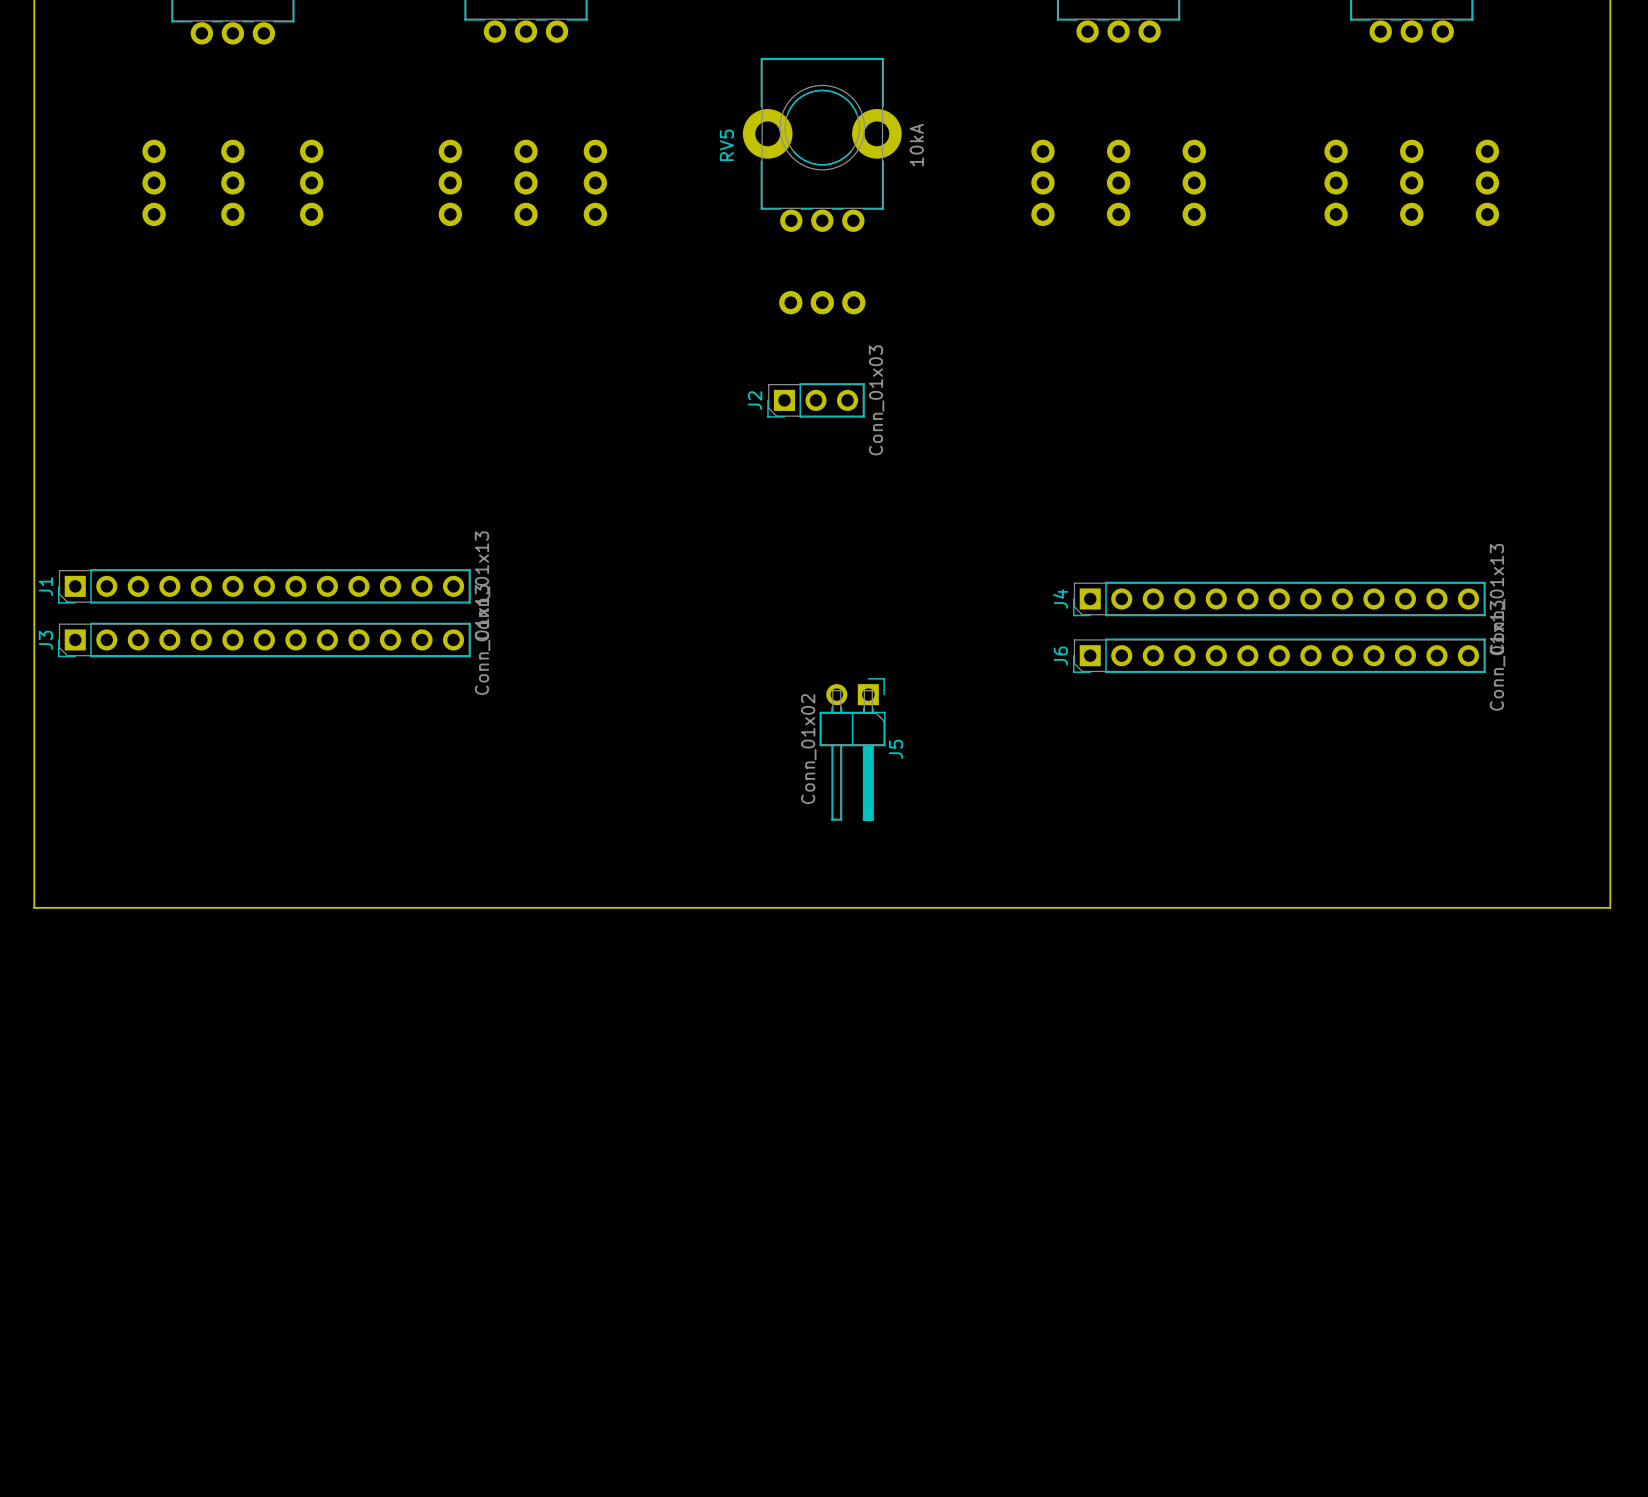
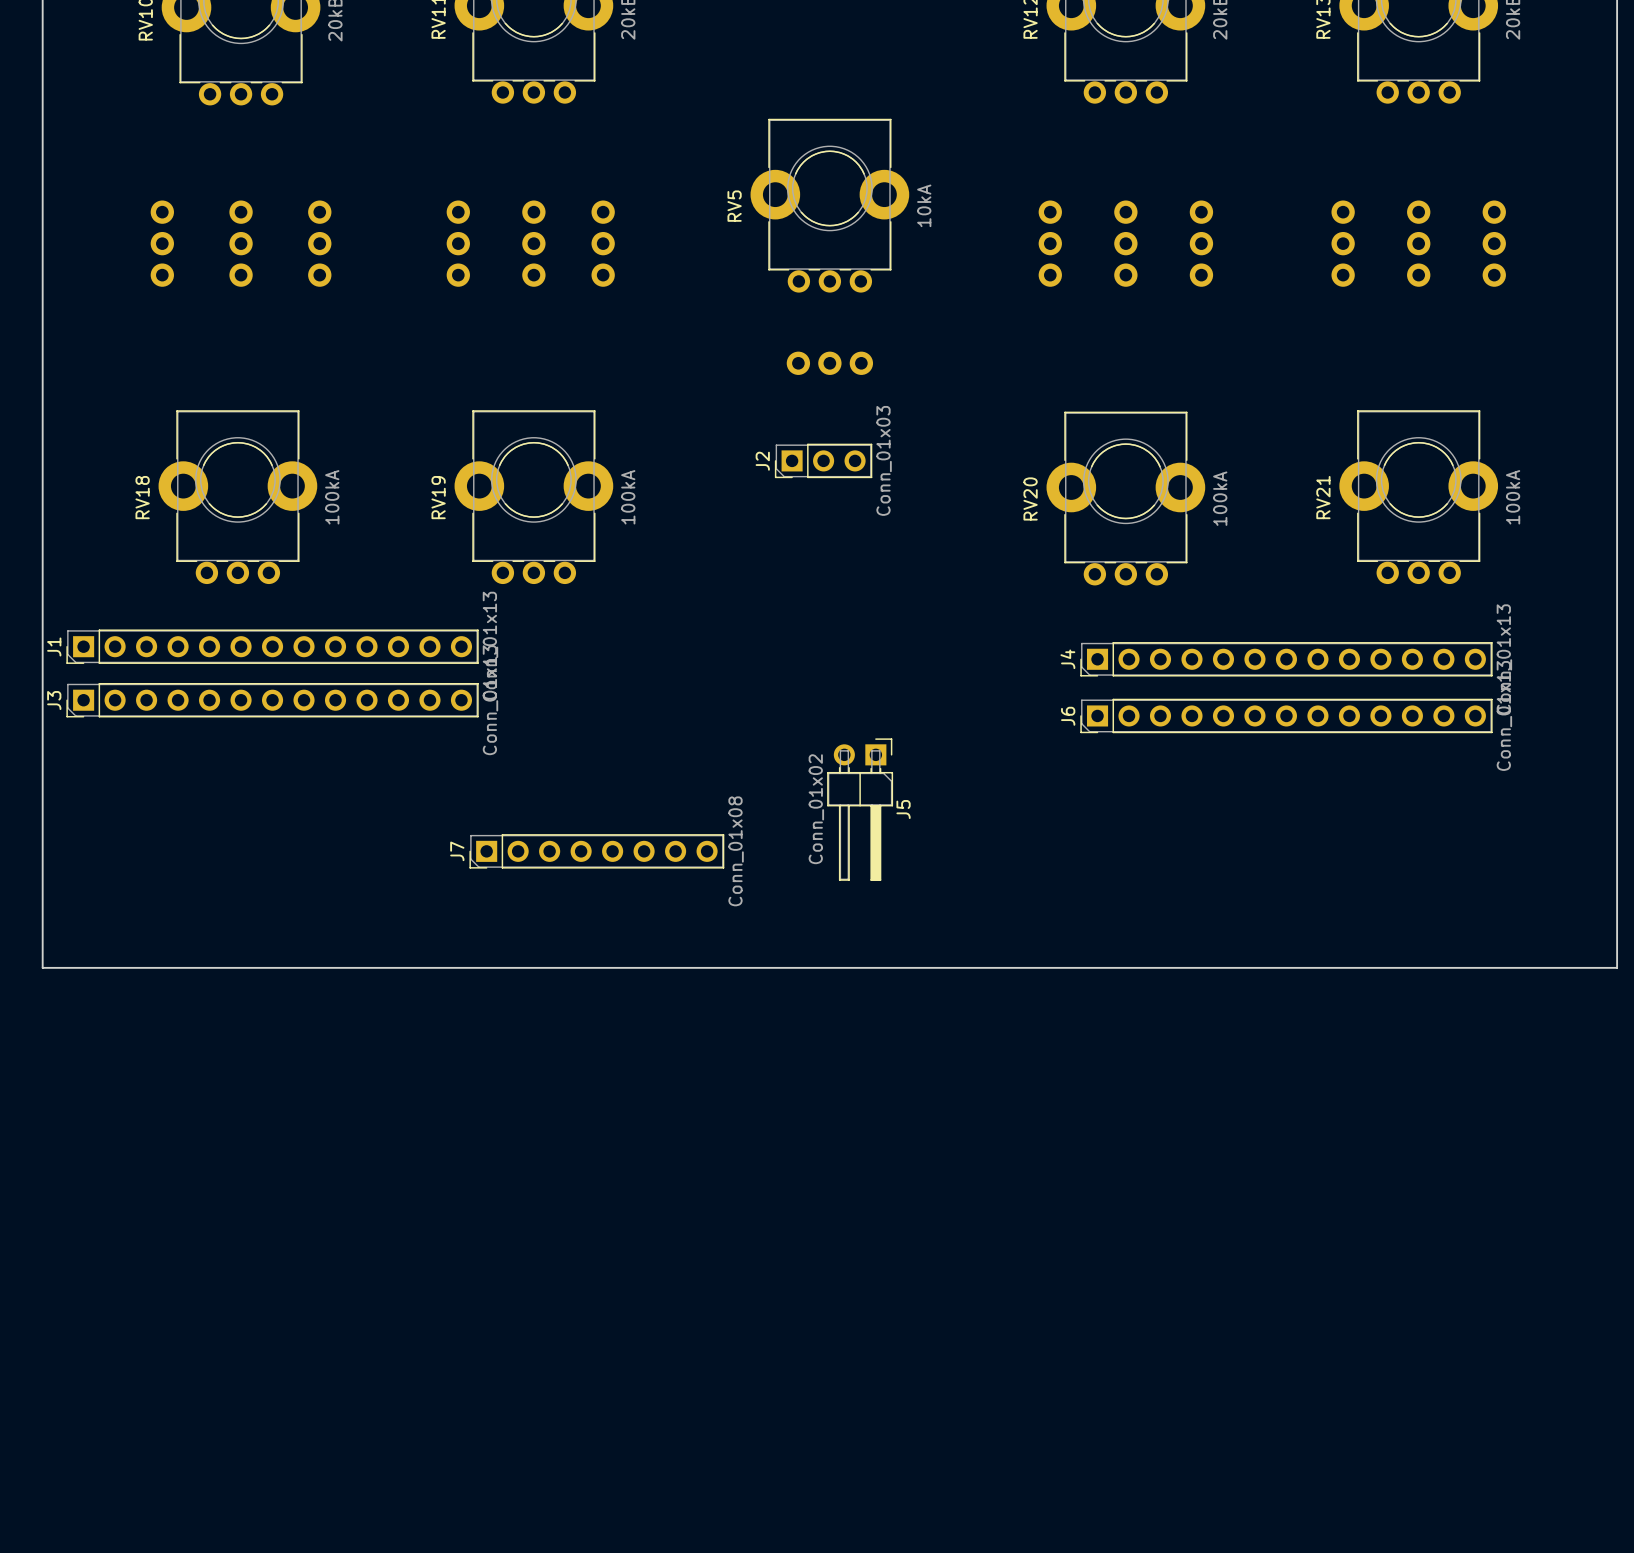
RV18: none -> 100kA (237, 497)
RV19: none -> 100kA (533, 497)
RV21: none -> 100kA (1418, 497)
RV20: none -> 100kA (1125, 498)
J7: none -> Conn_01x08 (596, 851)

